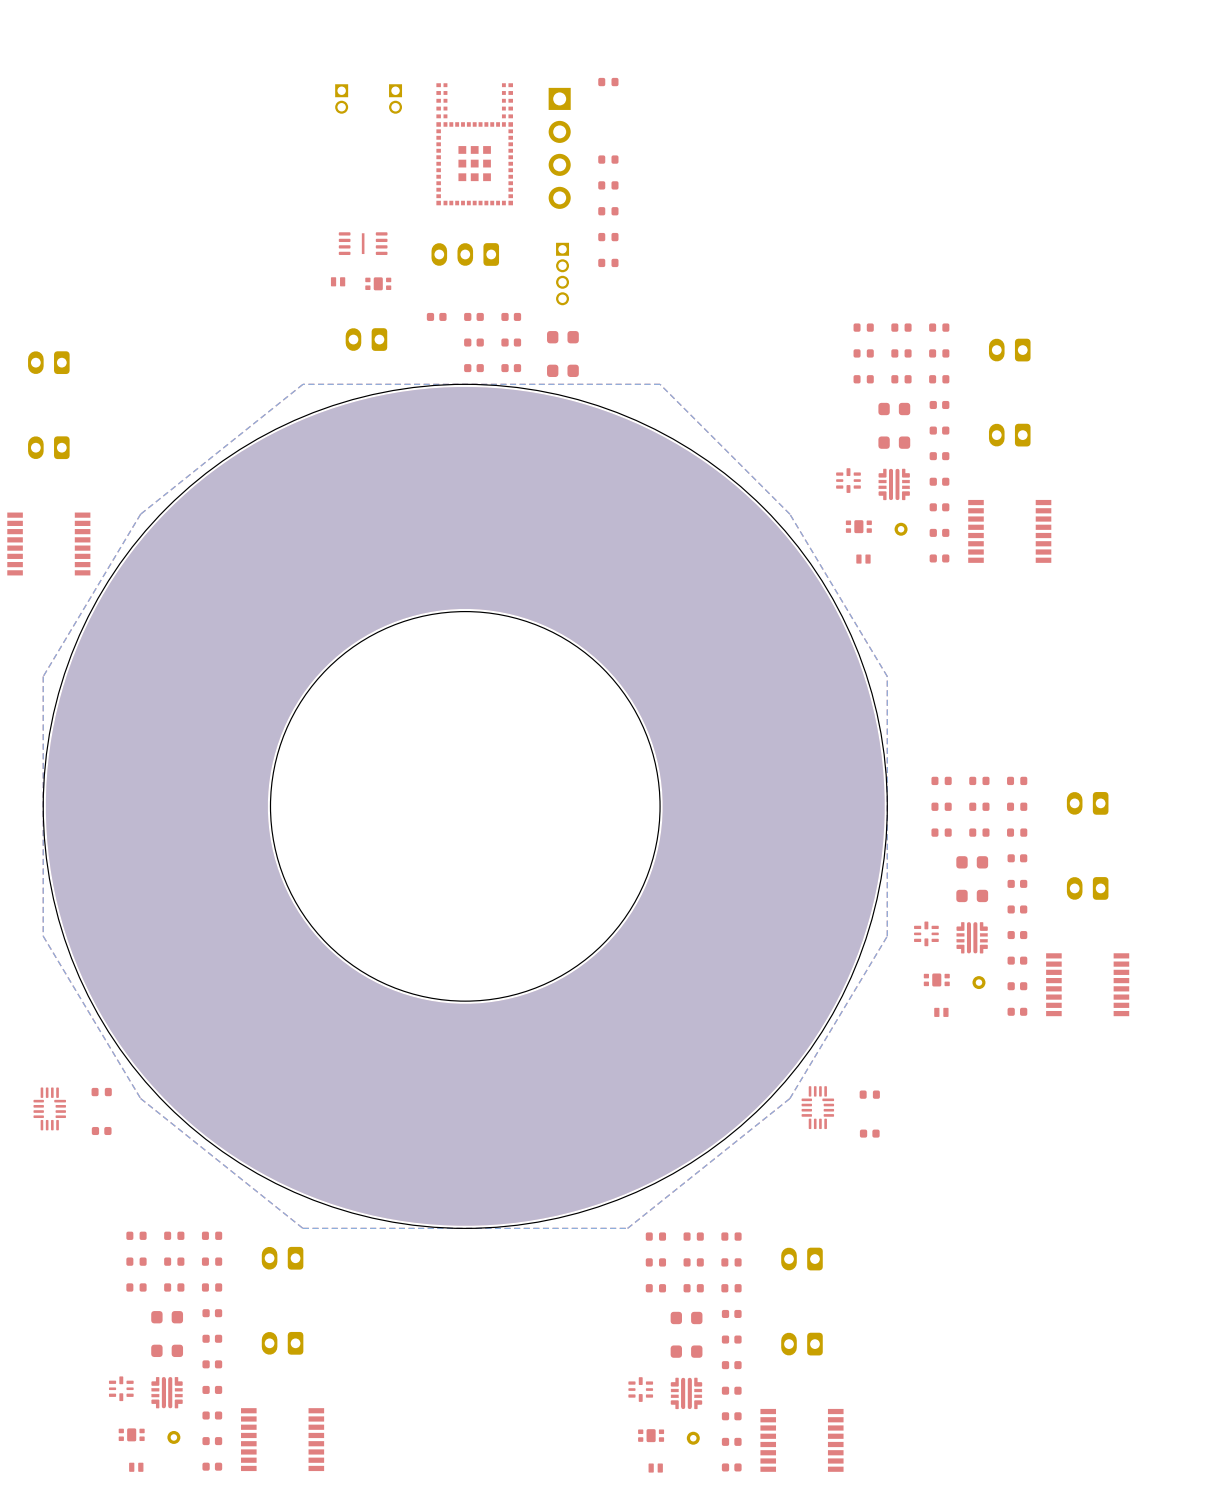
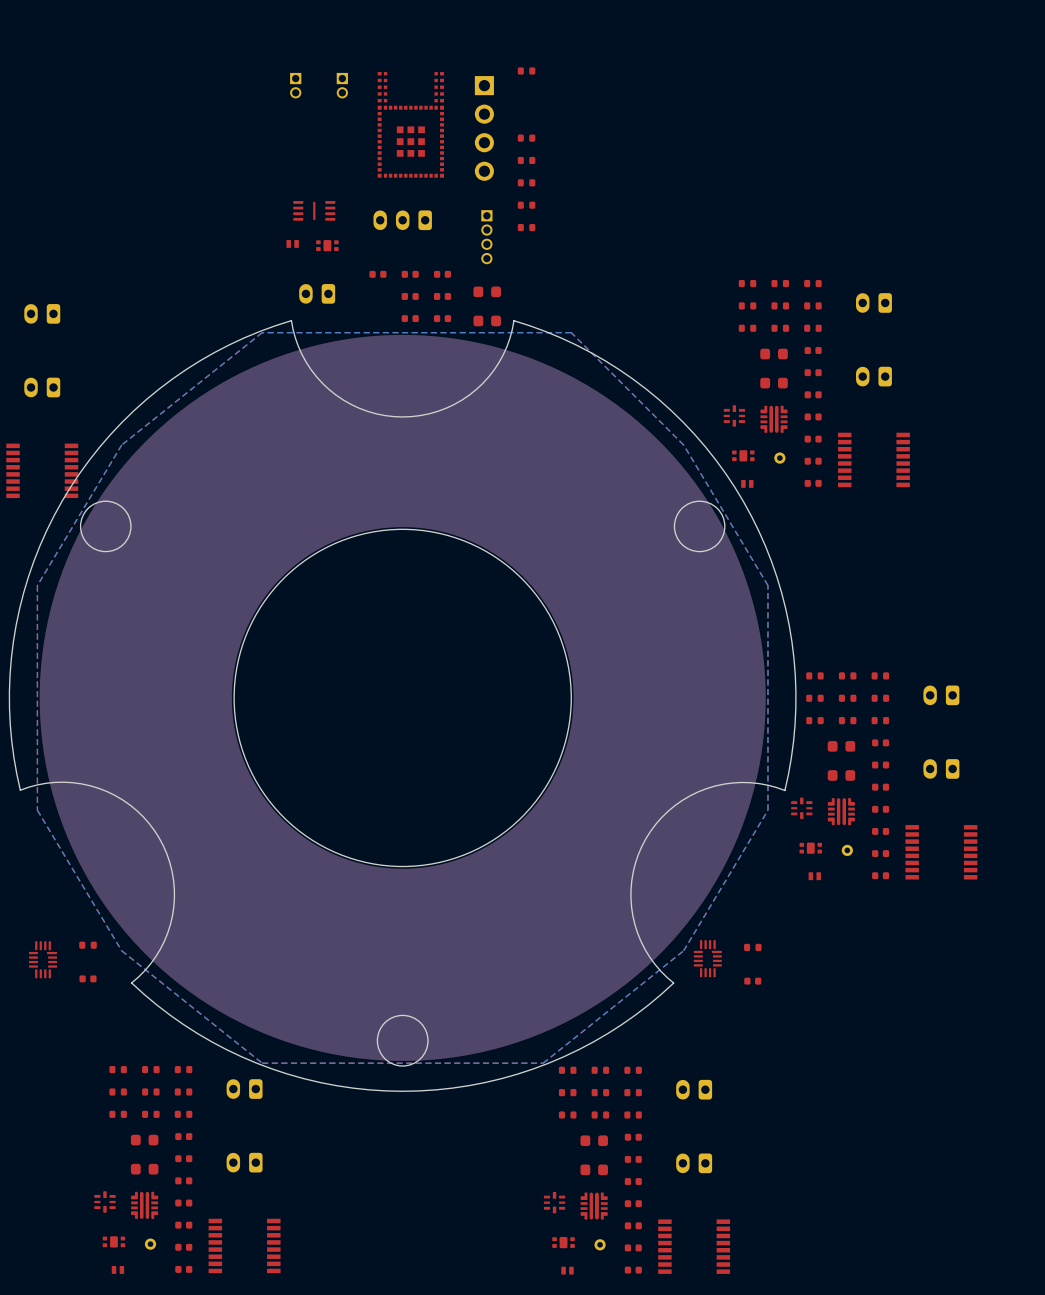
board edge: none -> (291, 320) (293, 329) (295, 337) (306, 362) (329, 389) (359, 408) (393, 416) (411, 416) (437, 411) (469, 395) (482, 383) (499, 362) (510, 338) (513, 320) (545, 331) (590, 352) (646, 388) (683, 422) (705, 446) (743, 501) (758, 530) (777, 577) (789, 625) (795, 675) (795, 724) (784, 790) (750, 782) (715, 786) (682, 800) (661, 817) (650, 831) (638, 854) (633, 871) (630, 898) (634, 924) (645, 949) (660, 970) (673, 983) (635, 1015) (593, 1041) (548, 1063) (517, 1074) (468, 1085) (435, 1089) (369, 1089) (320, 1082) (288, 1074) (256, 1063) (211, 1041) (169, 1014) (131, 982) (144, 970) (160, 949) (170, 924) (173, 907) (174, 889) (169, 862) (159, 838) (149, 823) (122, 800) (90, 785) (54, 782) (20, 790) (11, 741) (9, 707) (13, 641) (28, 577) (46, 530) (62, 501) (99, 446) (134, 410) (159, 388) (186, 369) (229, 344) (260, 331) (275, 325) (291, 320)
round board edge: [42, 384, 888, 1229] -> none
round board edge: none -> [80, 500, 132, 552]
round board edge: none -> [674, 500, 726, 552]
round board edge: none -> [377, 1015, 429, 1067]

